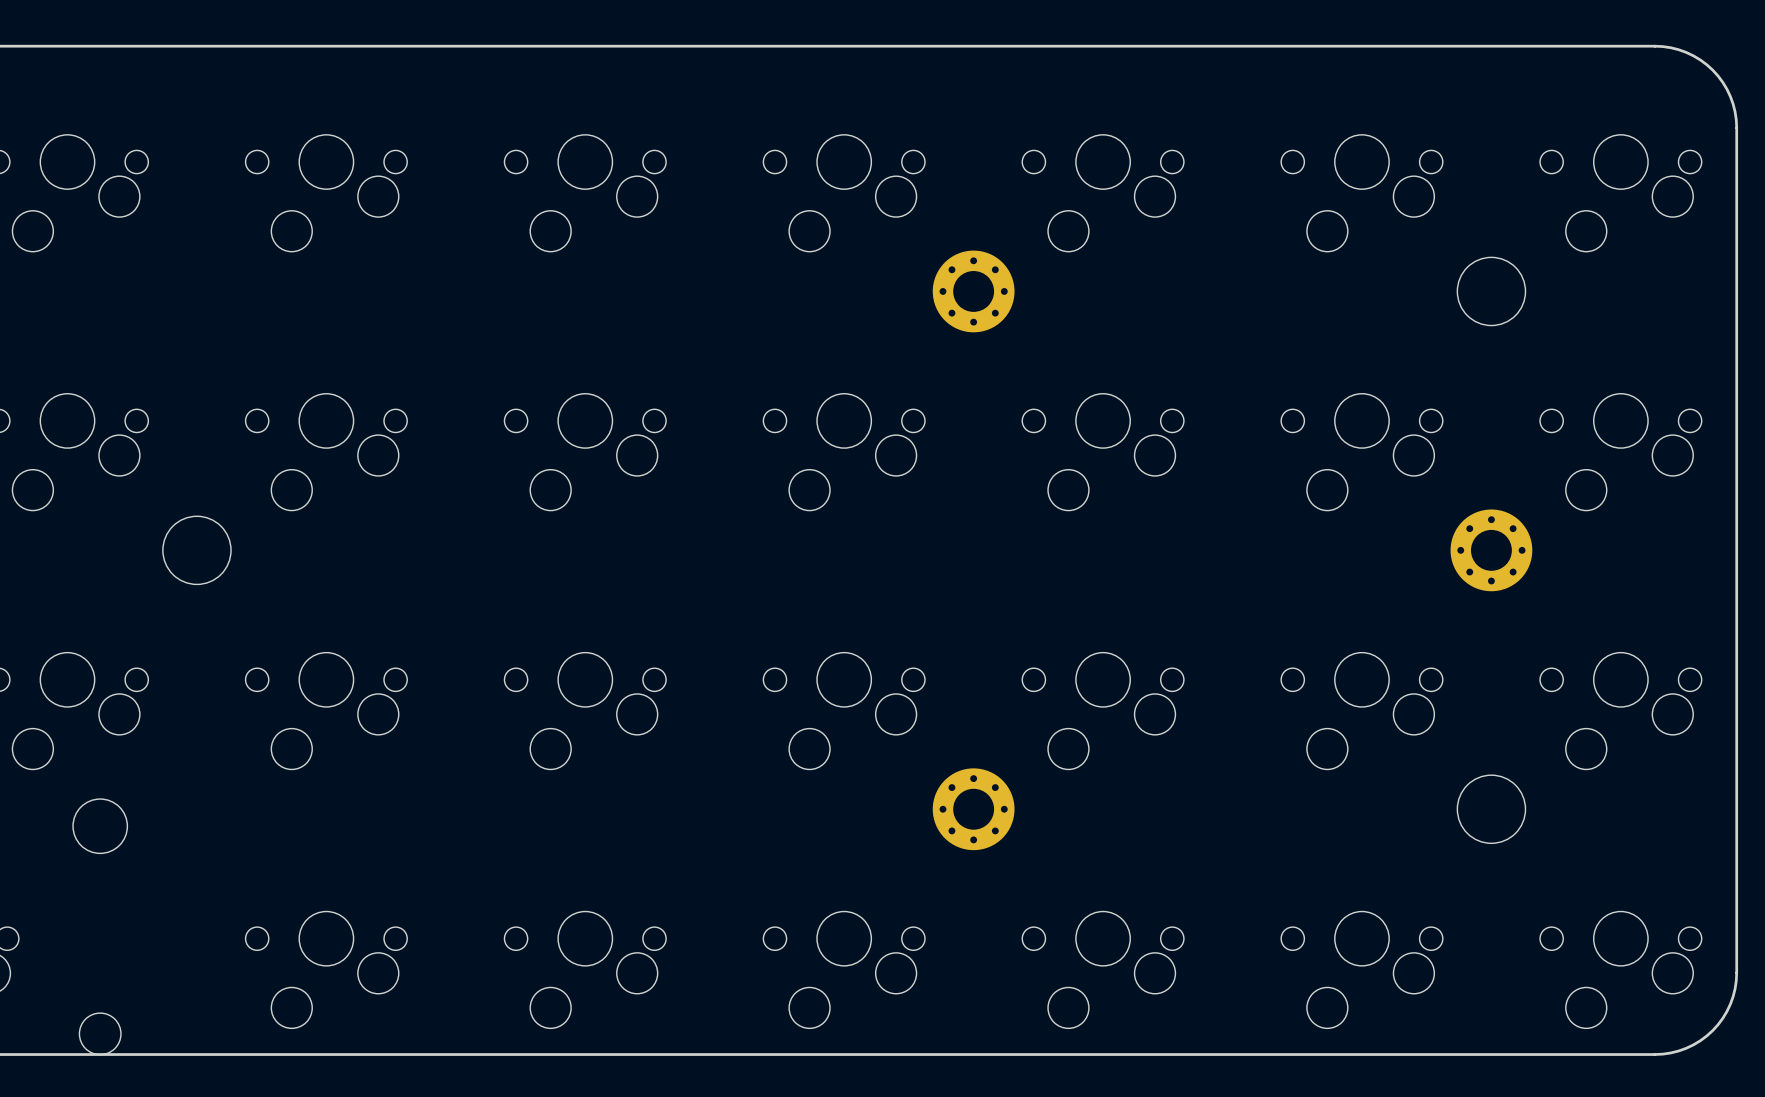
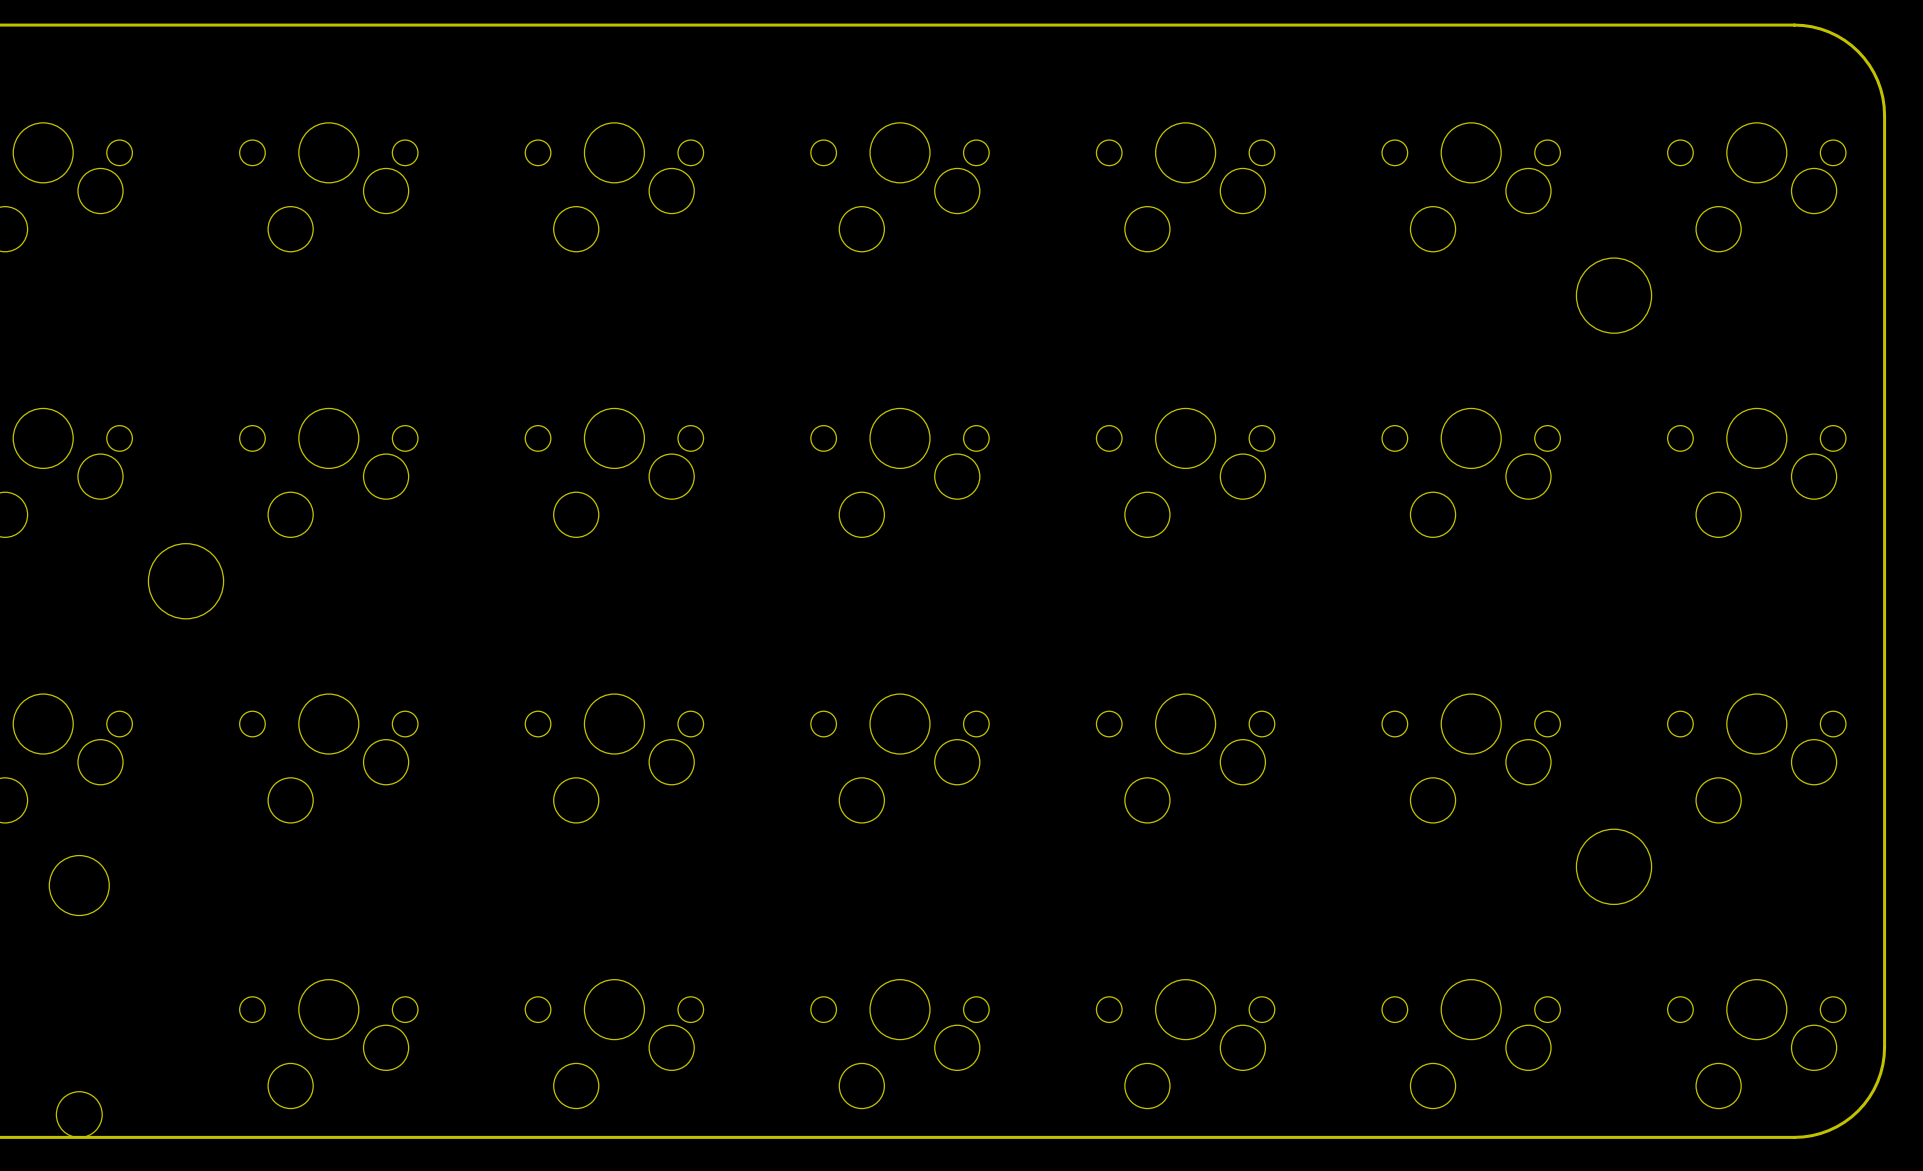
part: (973, 291) -> none
part: (1491, 550) -> none
part: (973, 809) -> none

